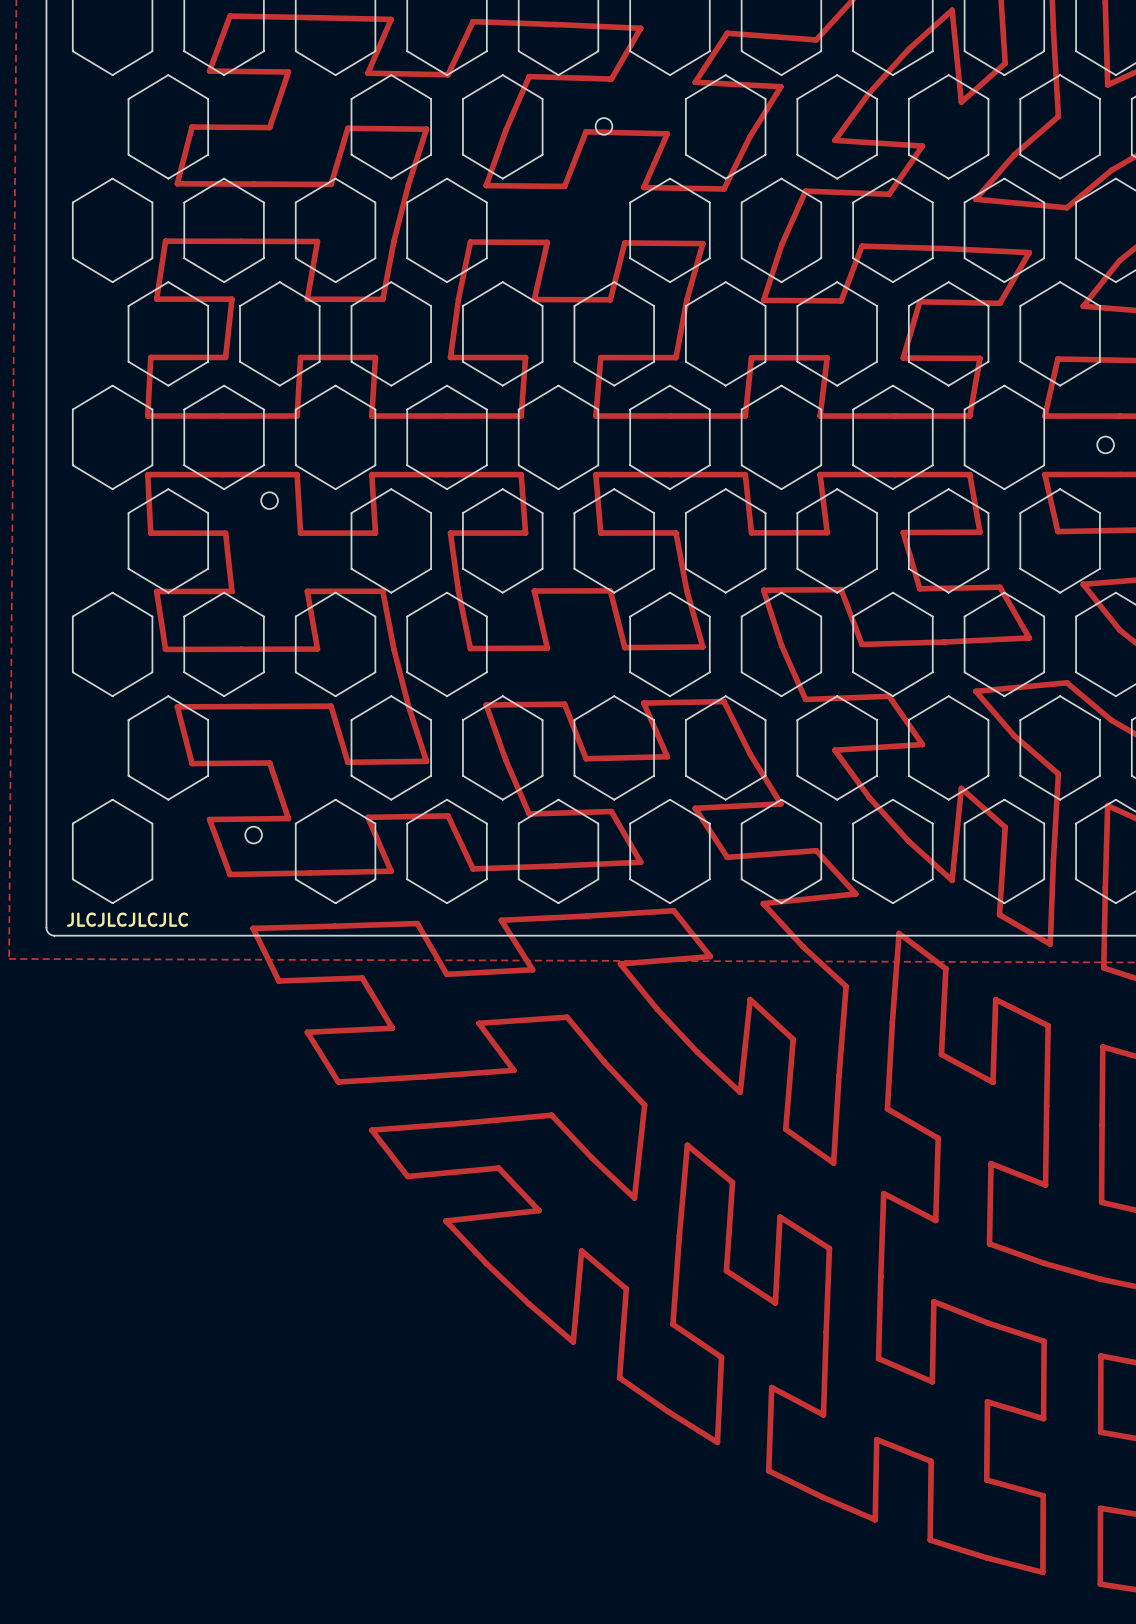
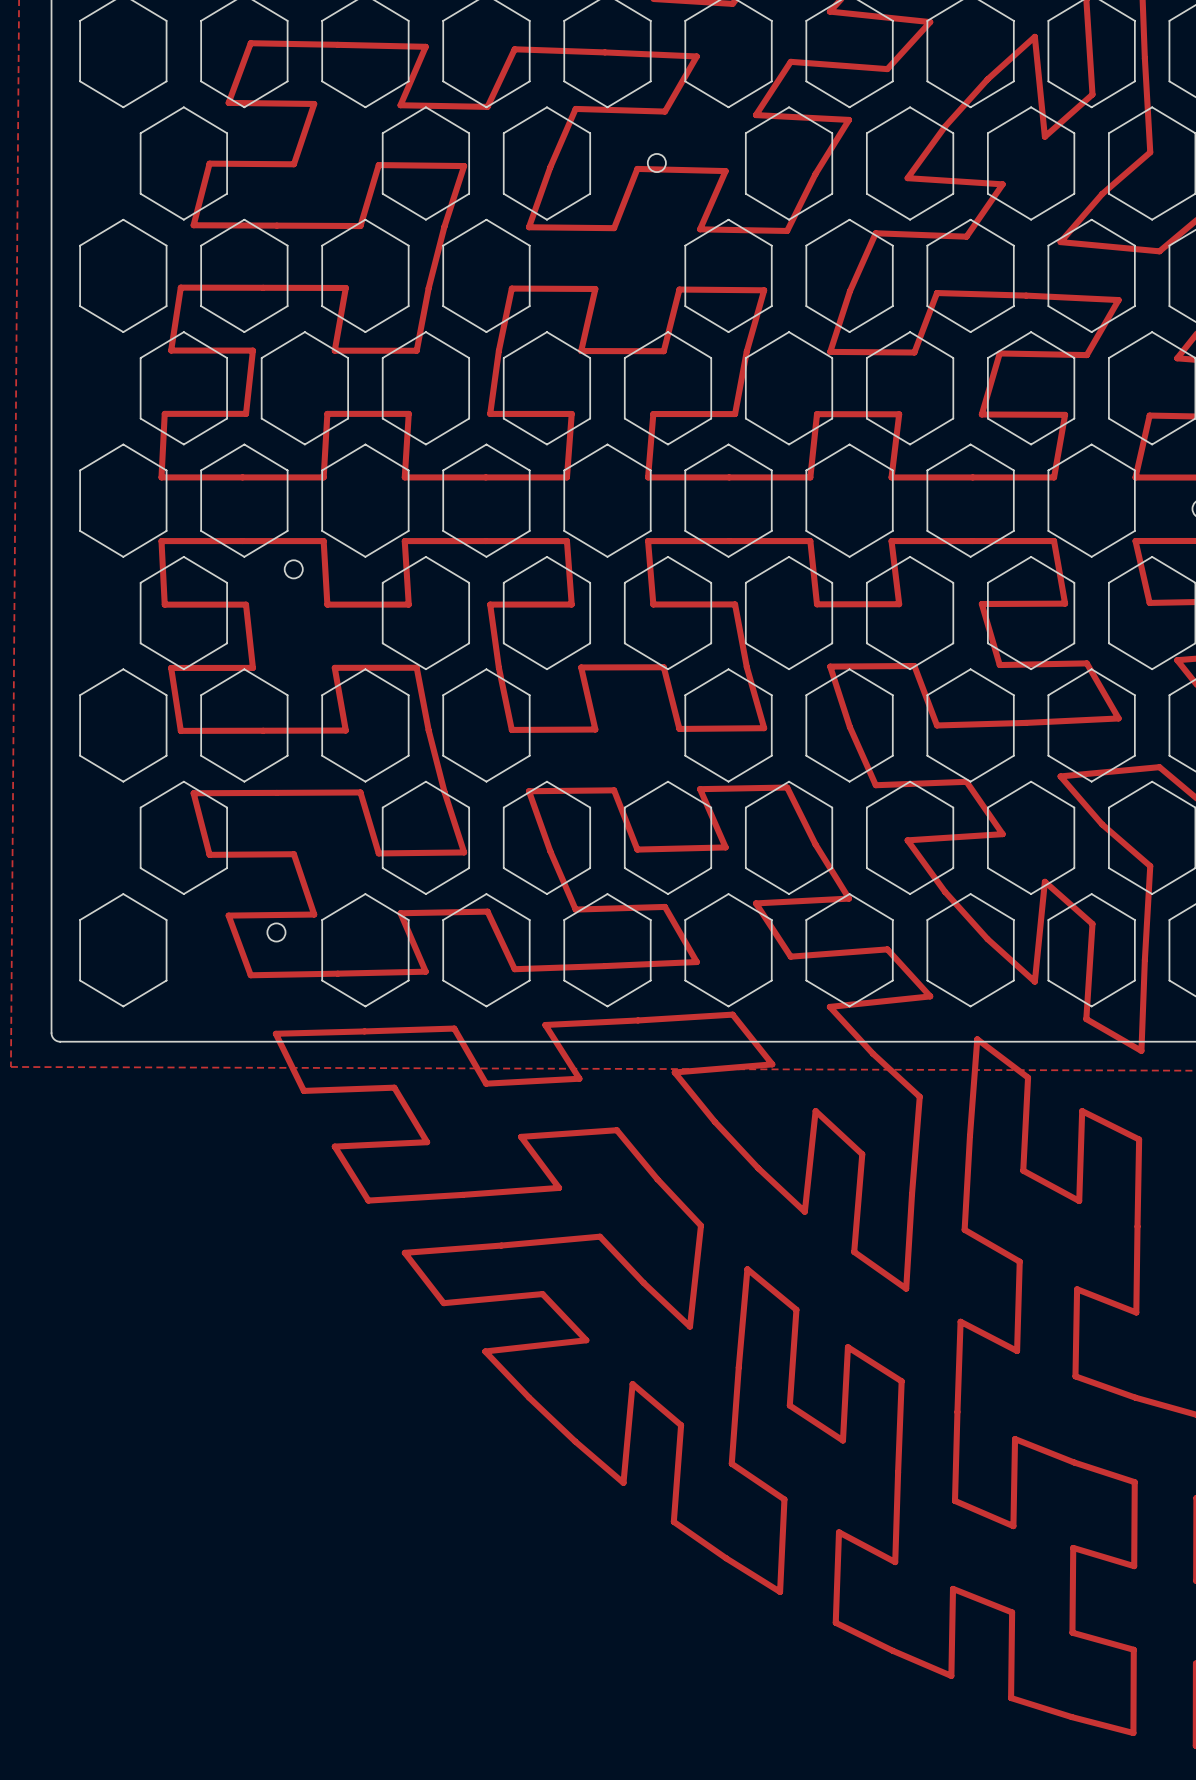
text: JLCJLCJLCJLC (127, 919) -> none

